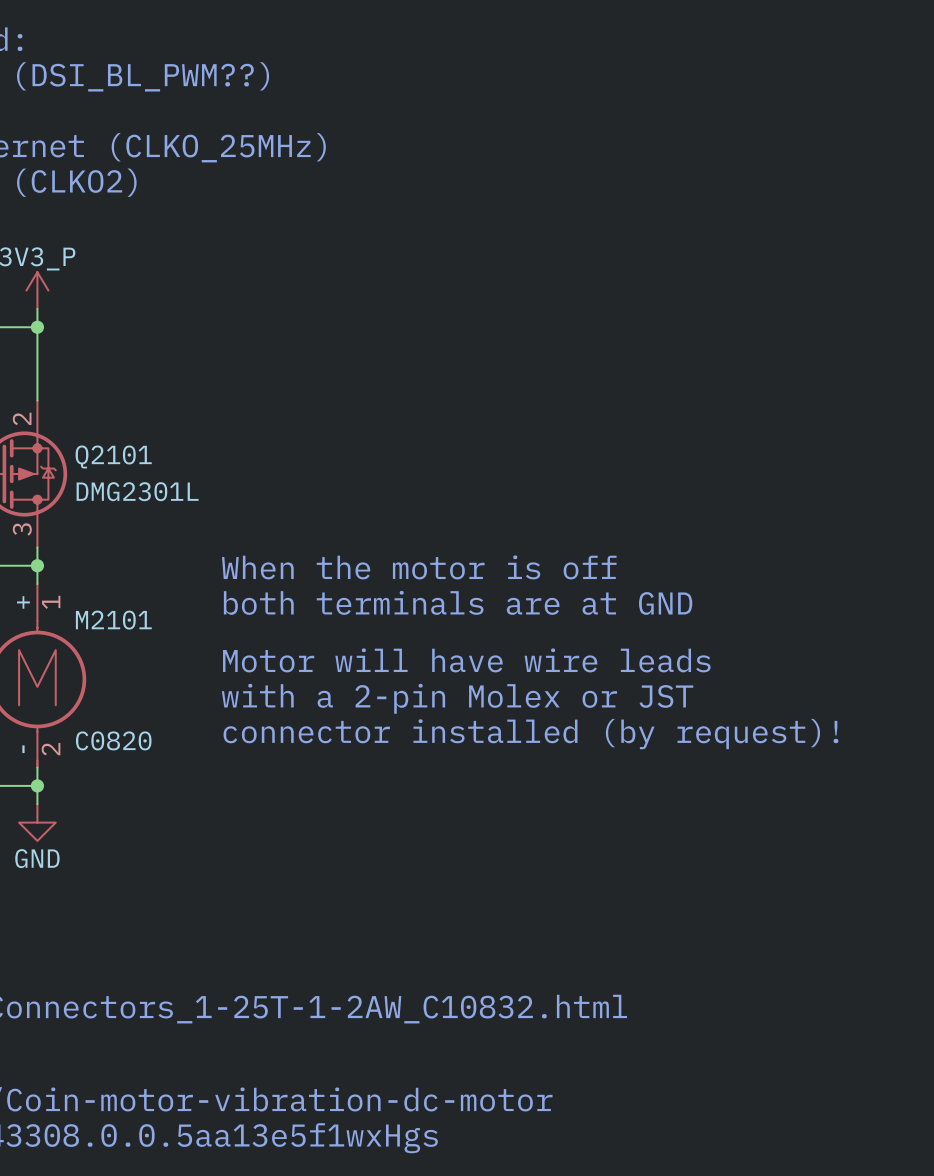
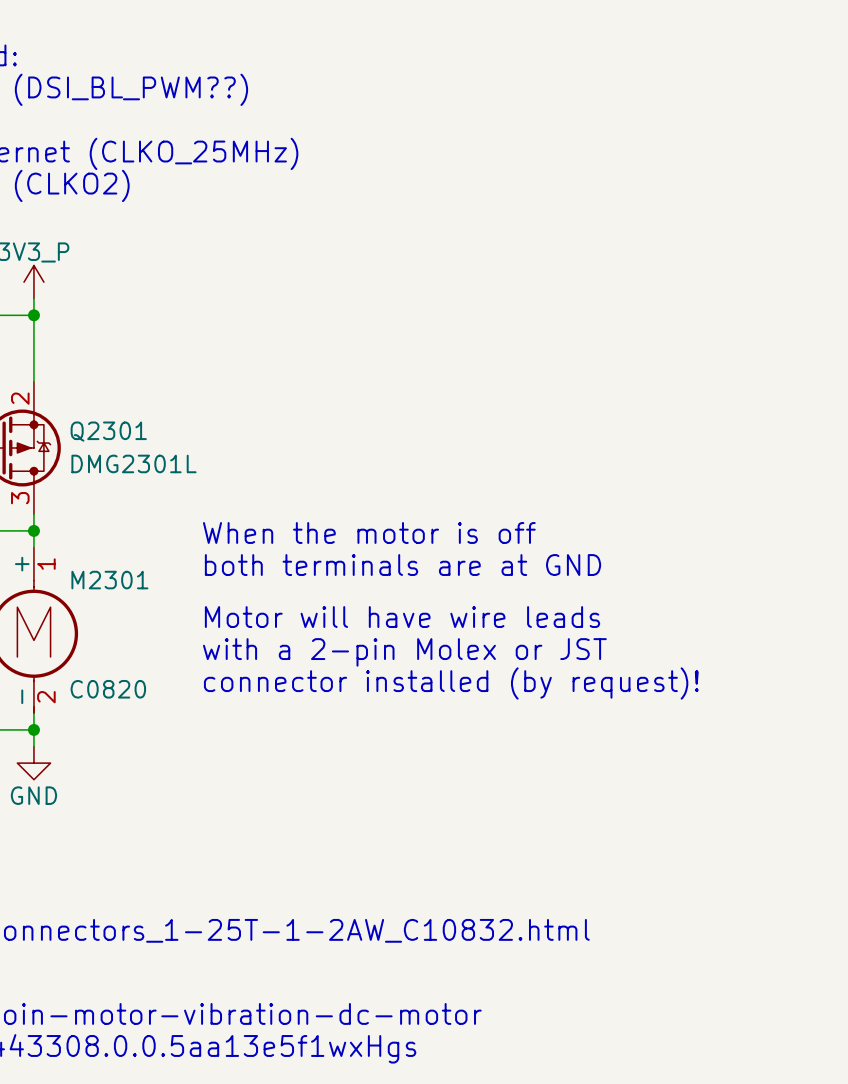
Q2101 name: Q2101 (113, 456) -> Q2301 (108, 431)
M2101 name: M2101 (113, 620) -> M2301 (109, 580)

